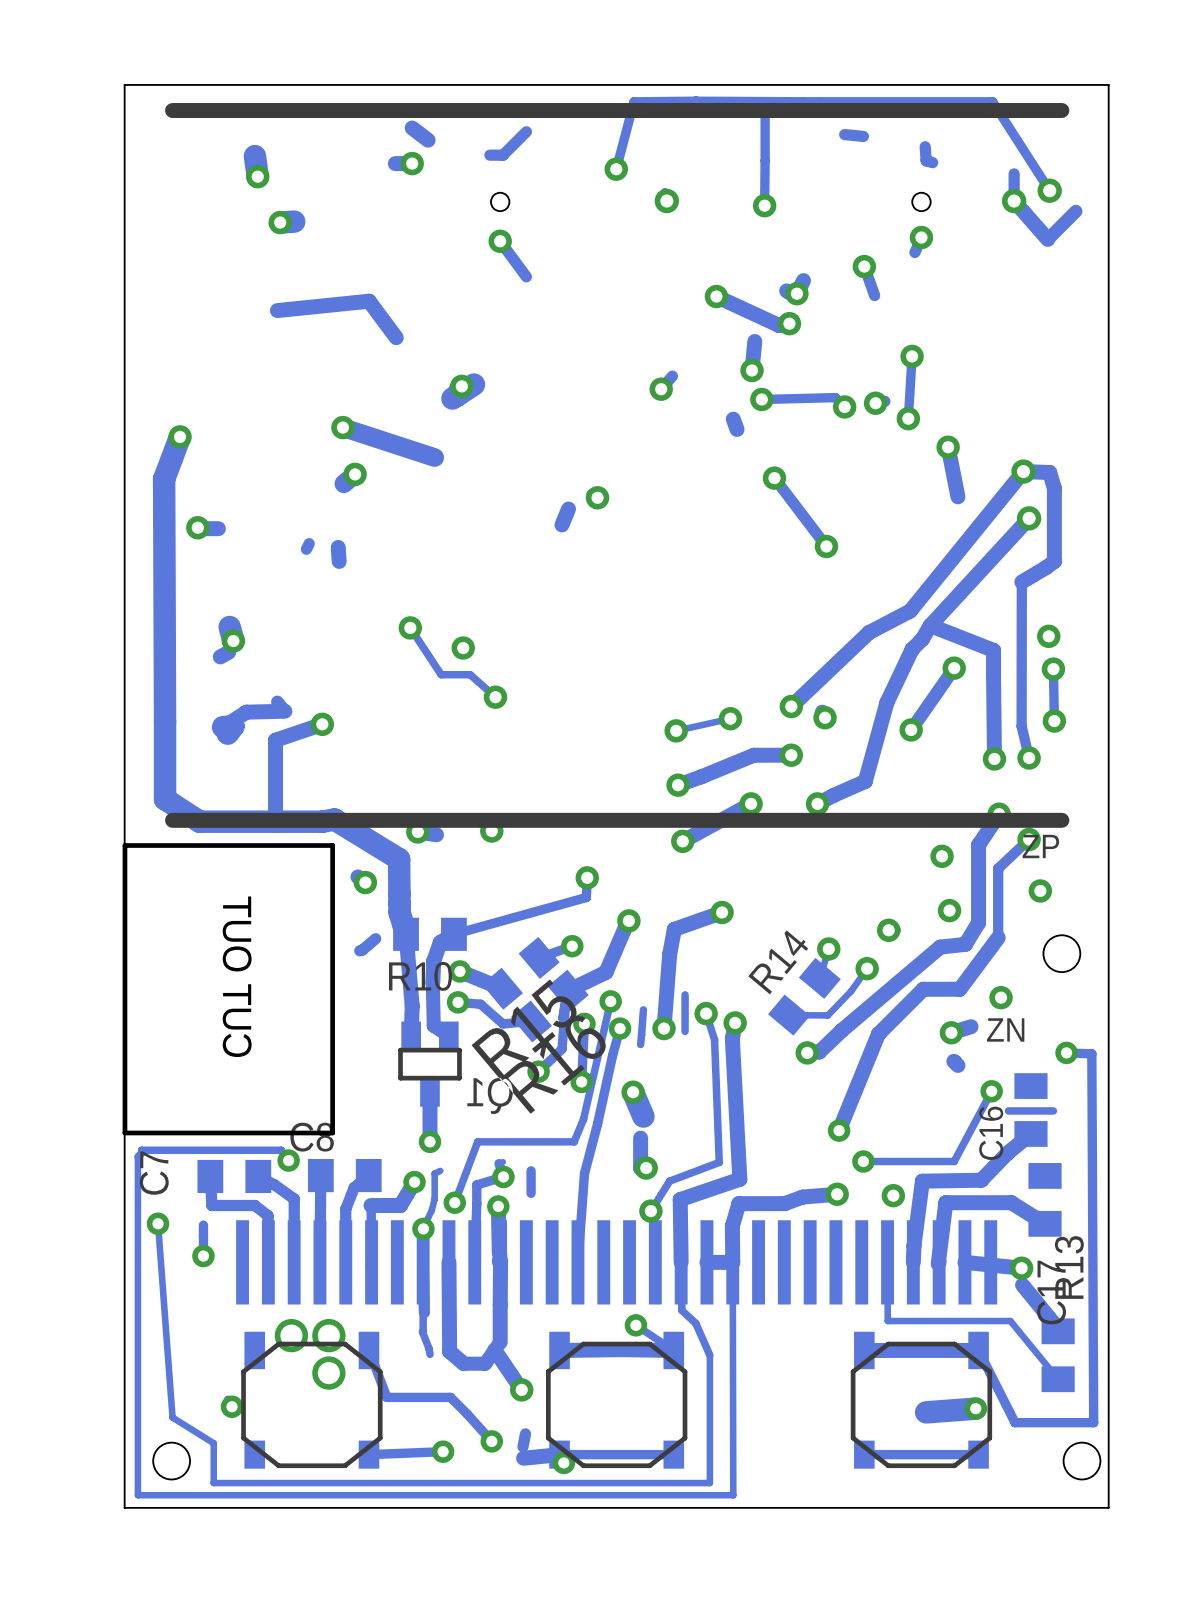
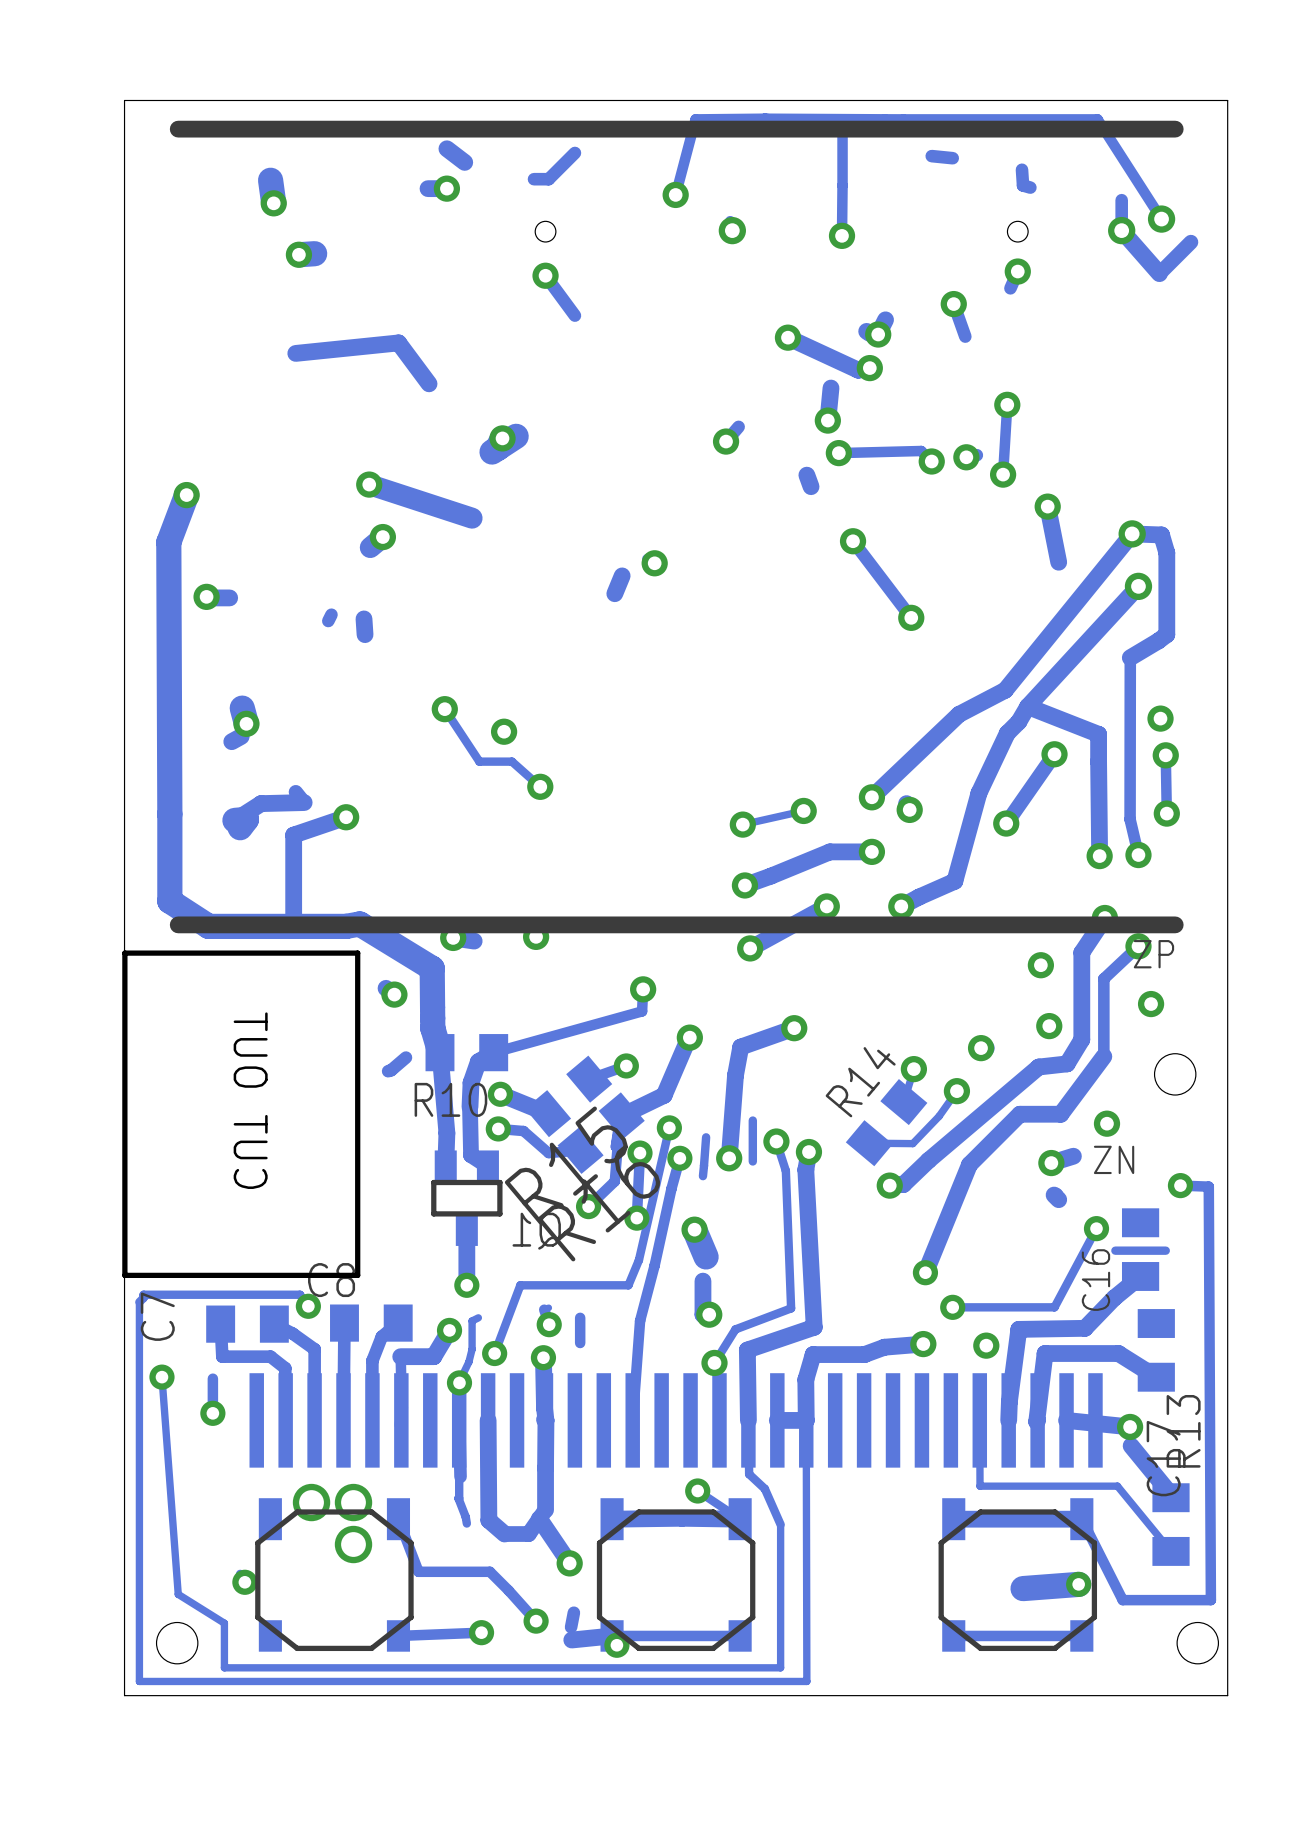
track: (503, 1176) (476, 1184) (474, 1262) -> none

